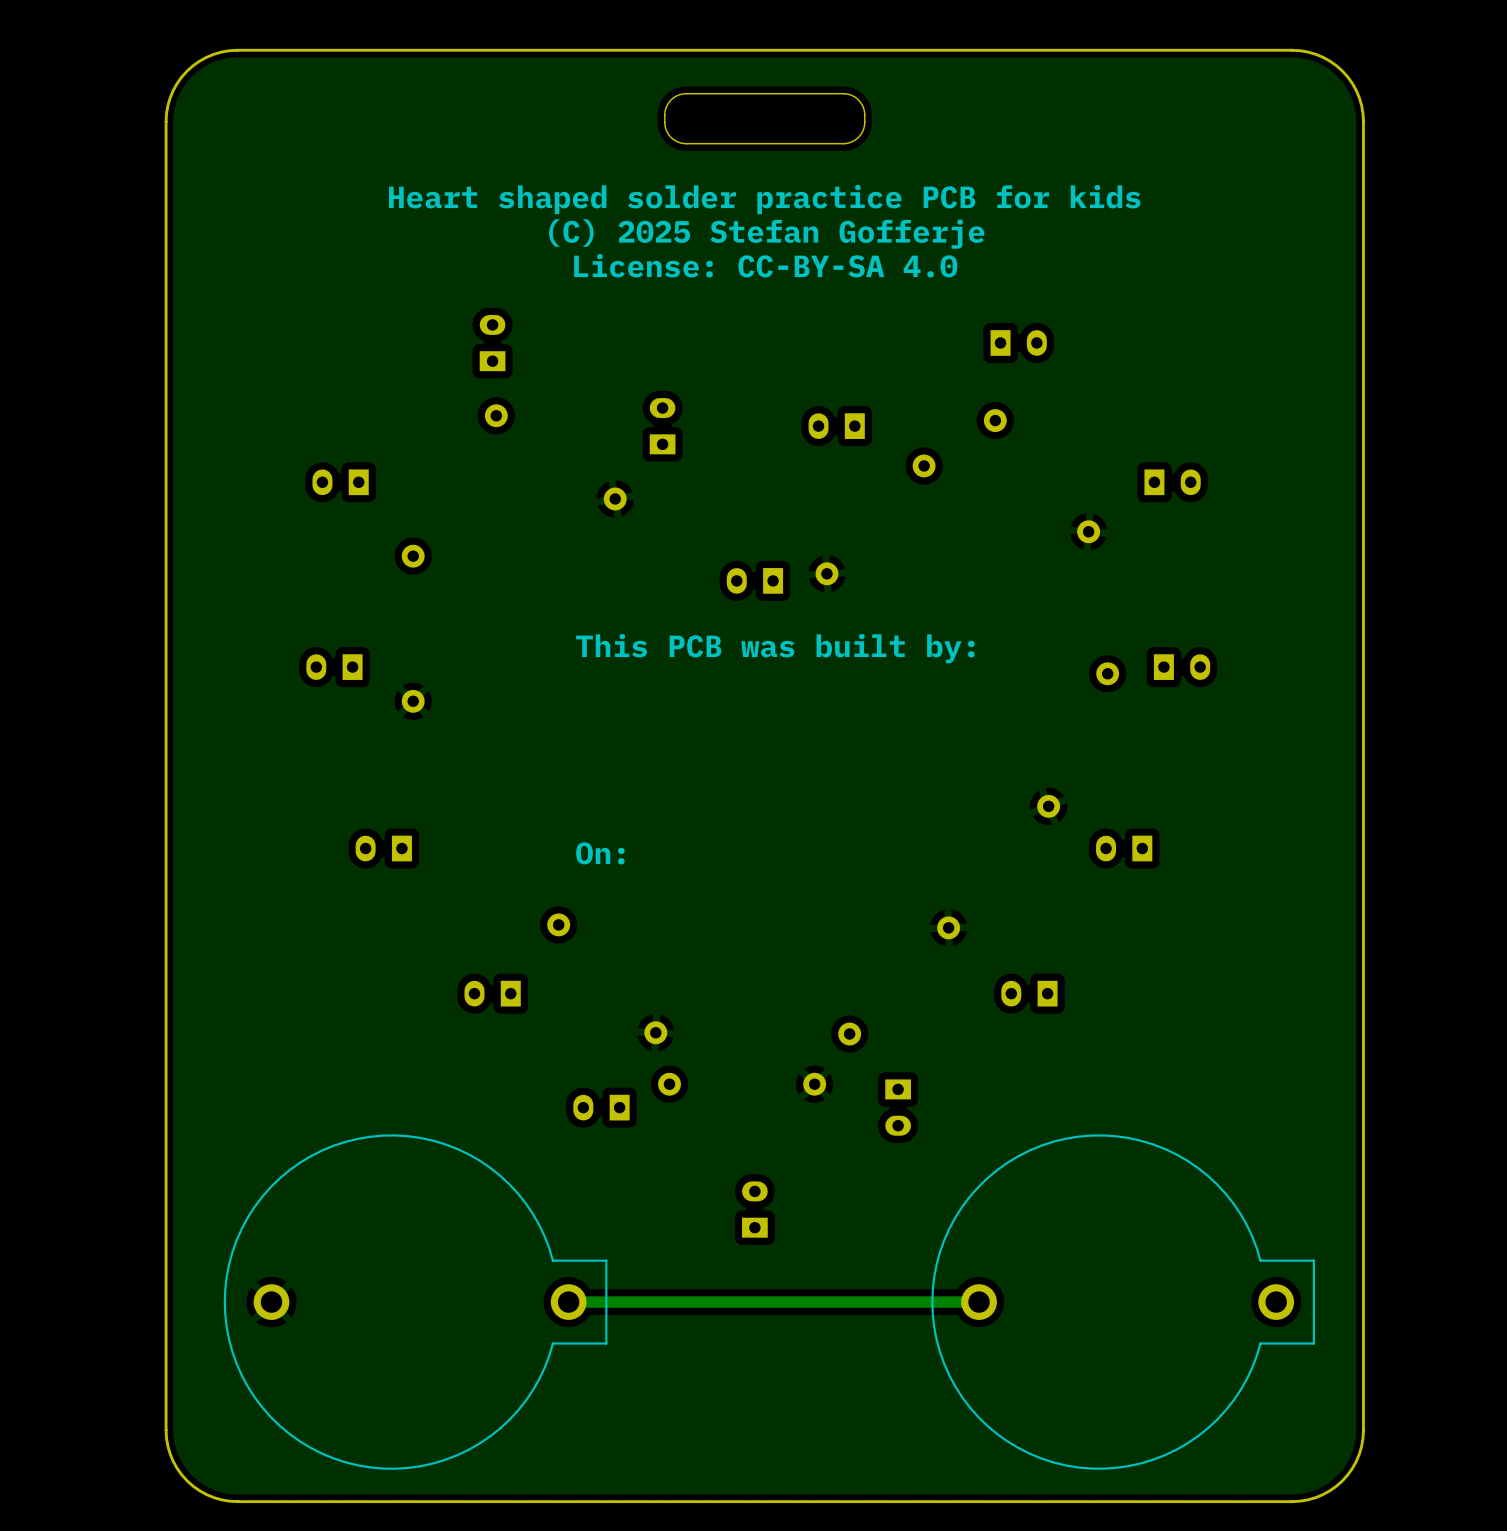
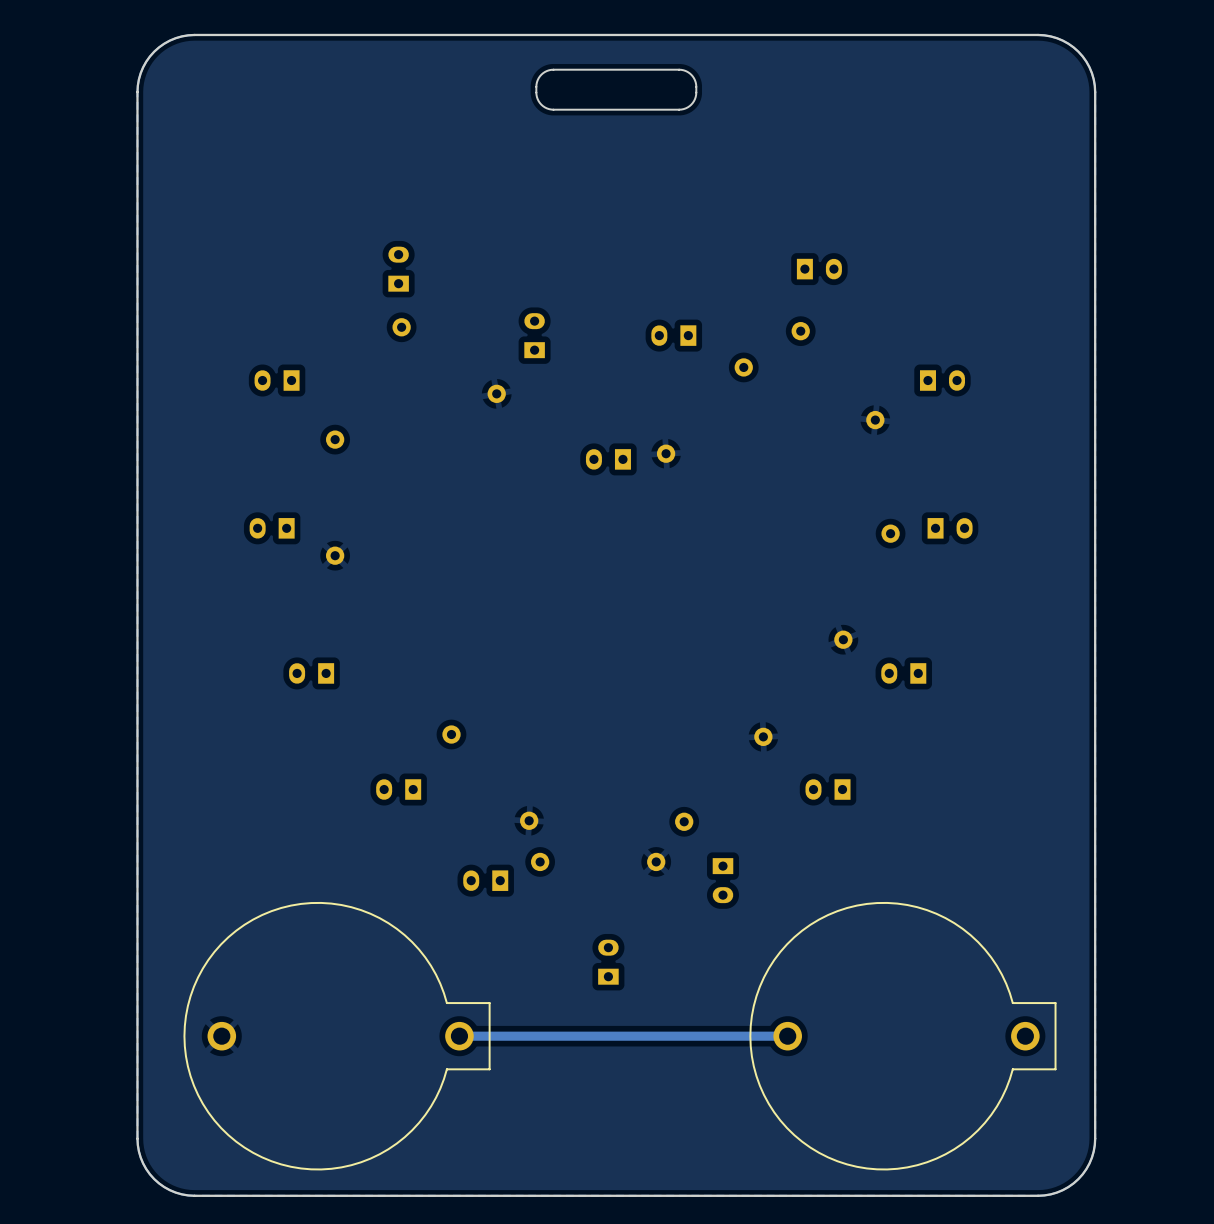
text: Heart shaped solder practice PCB for kids (764, 199) -> none
text: (C) 2025 Stefan Gofferje (766, 233) -> none
text: License: CC-BY-SA 4.0 (765, 265) -> none
text: This PCB was built by: (775, 648) -> none
text: On: (600, 853) -> none

